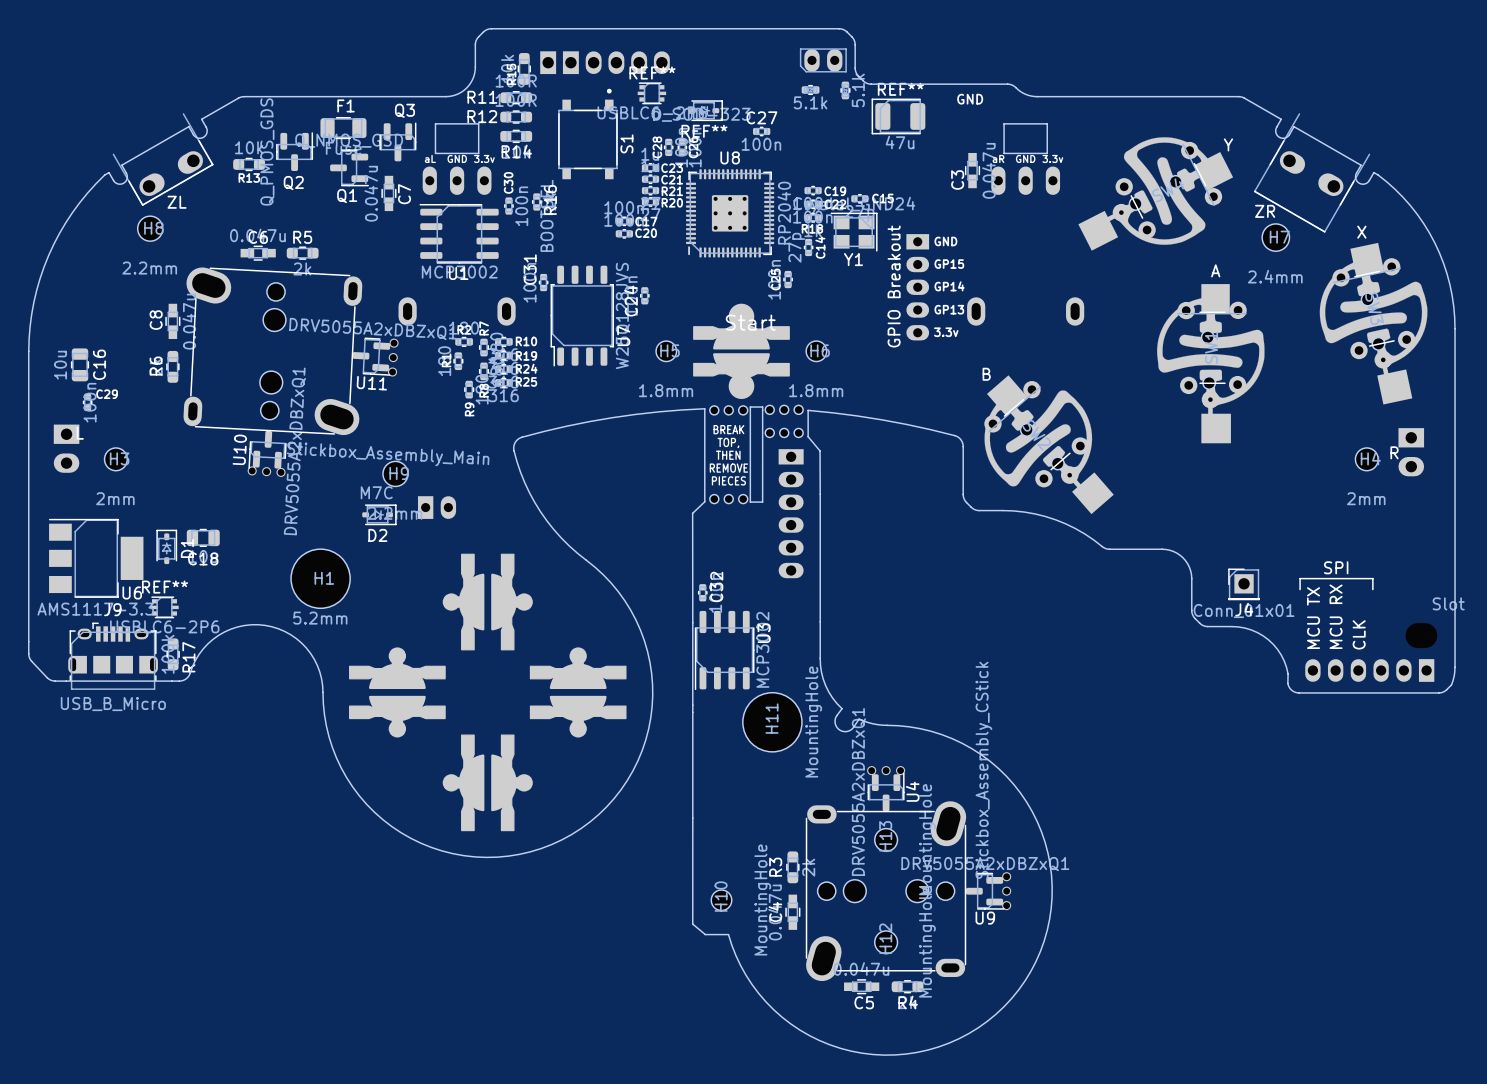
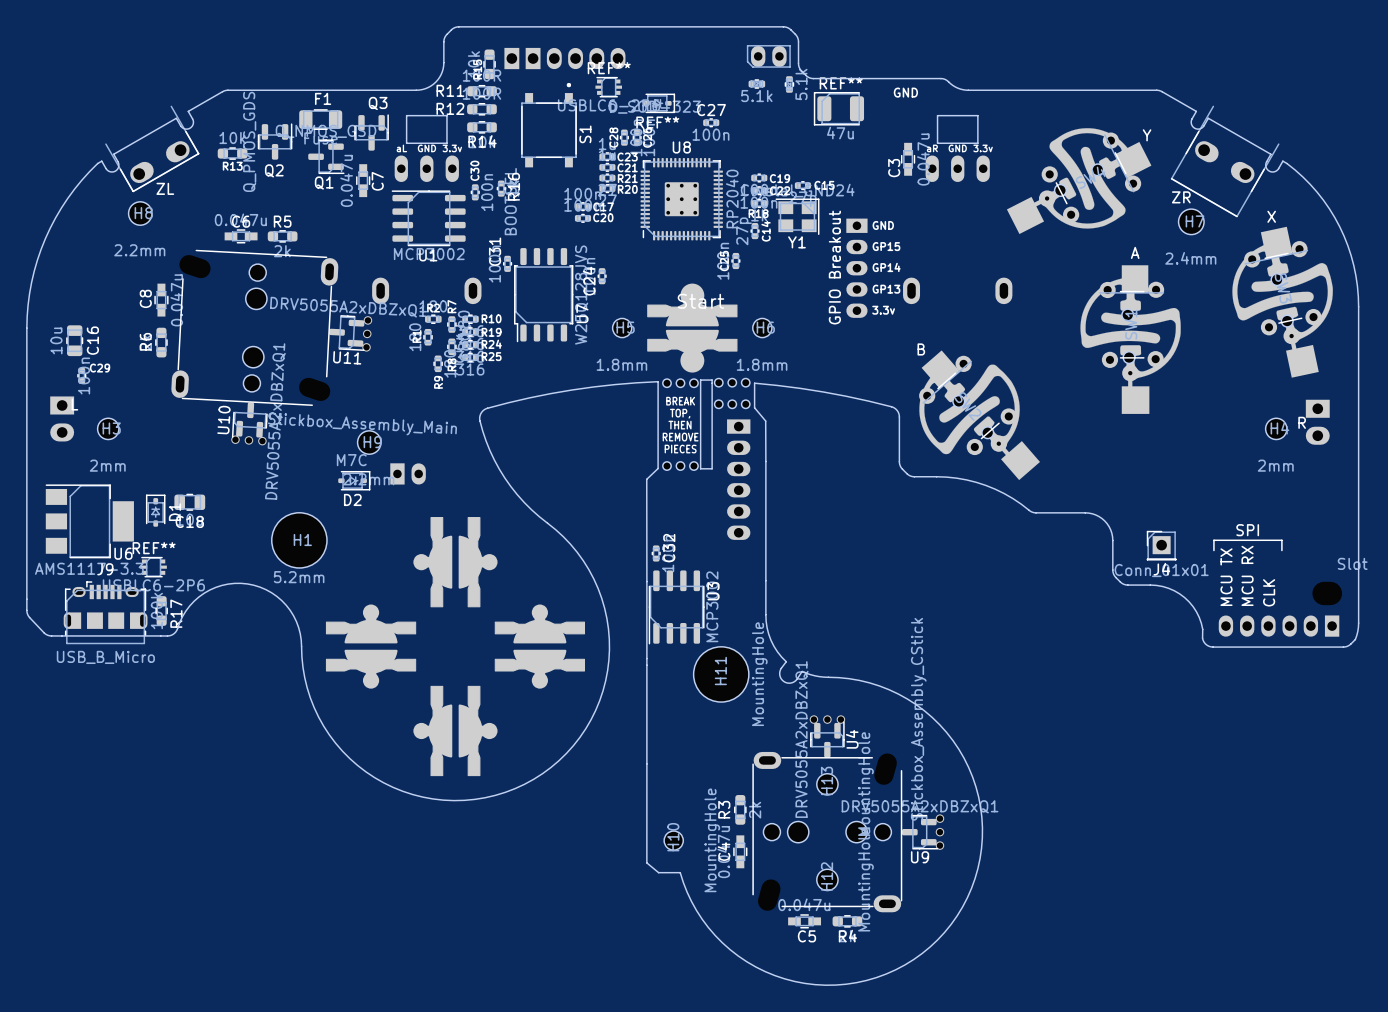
part footprint: [183, 267, 399, 477] -> [171, 249, 373, 446]
part footprint: [805, 766, 1012, 982] -> [752, 715, 945, 913]

